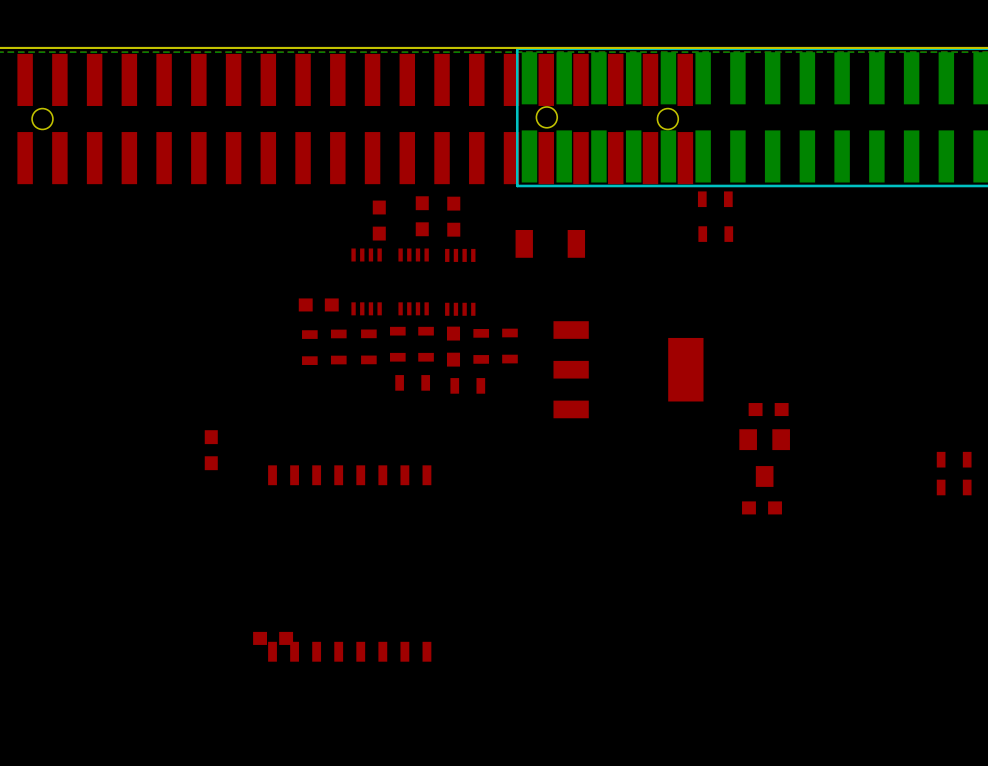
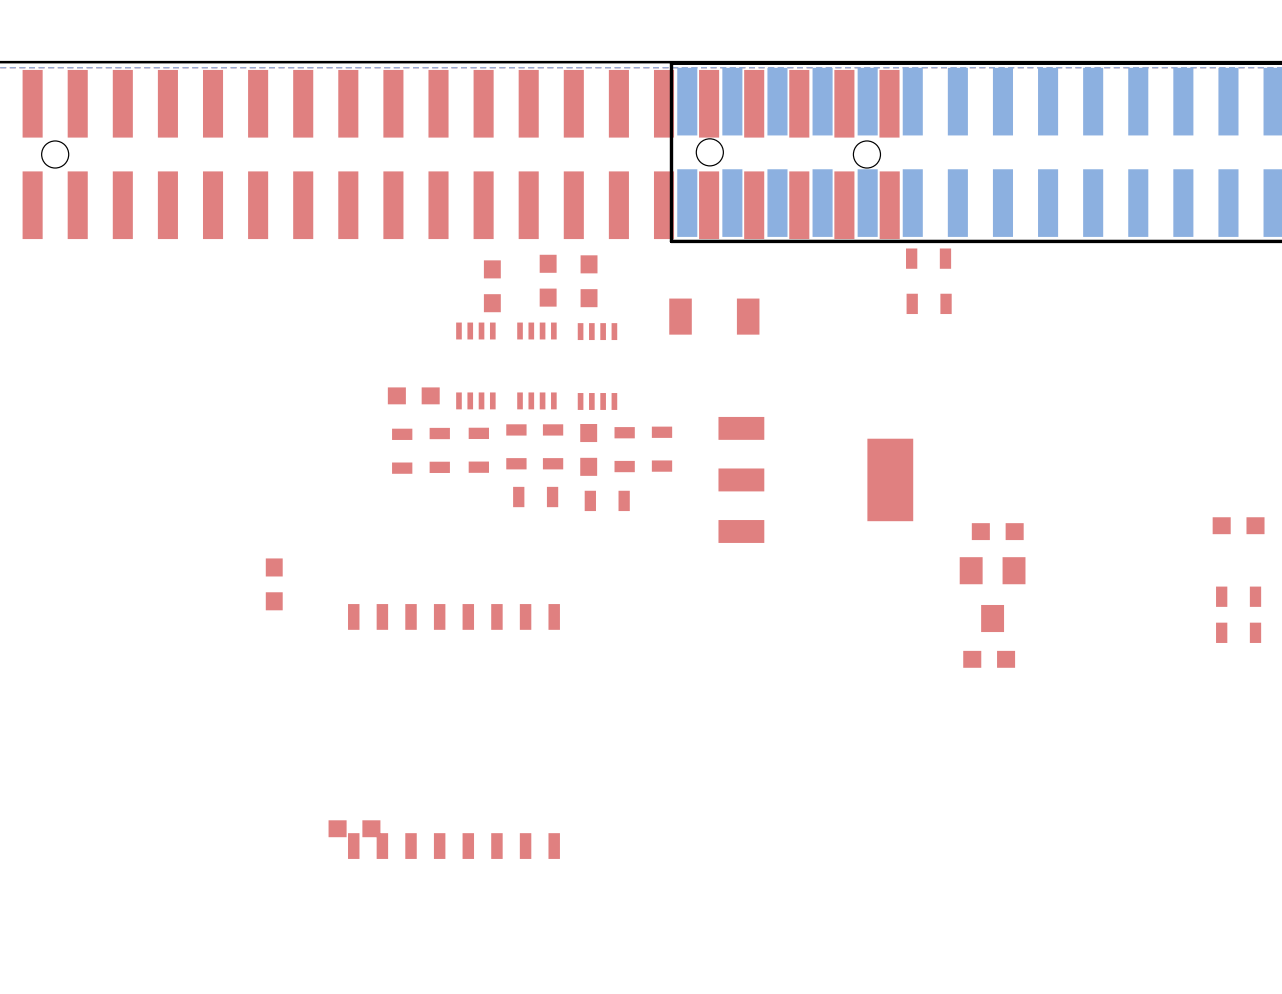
part: none -> (1238, 525)

